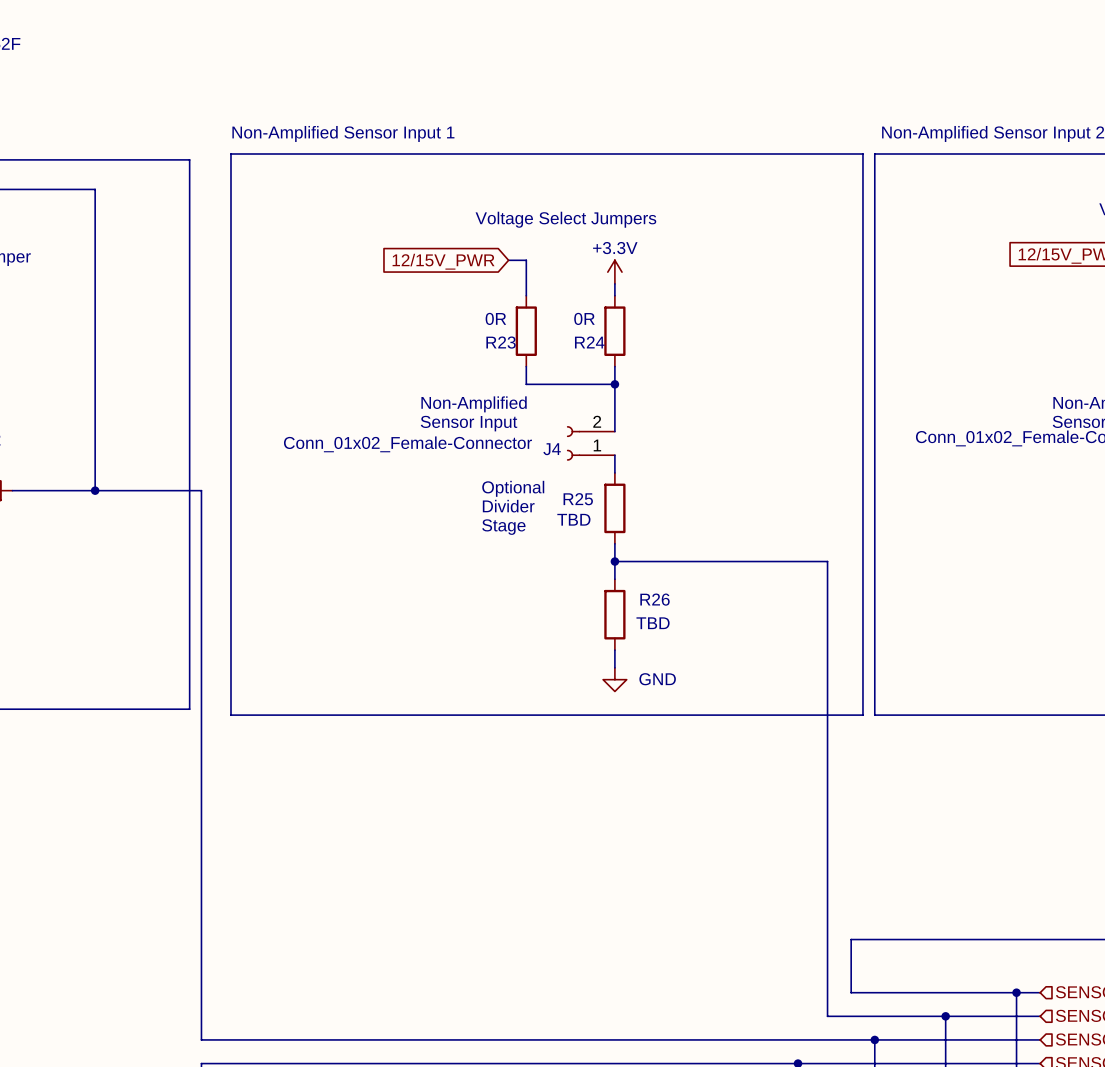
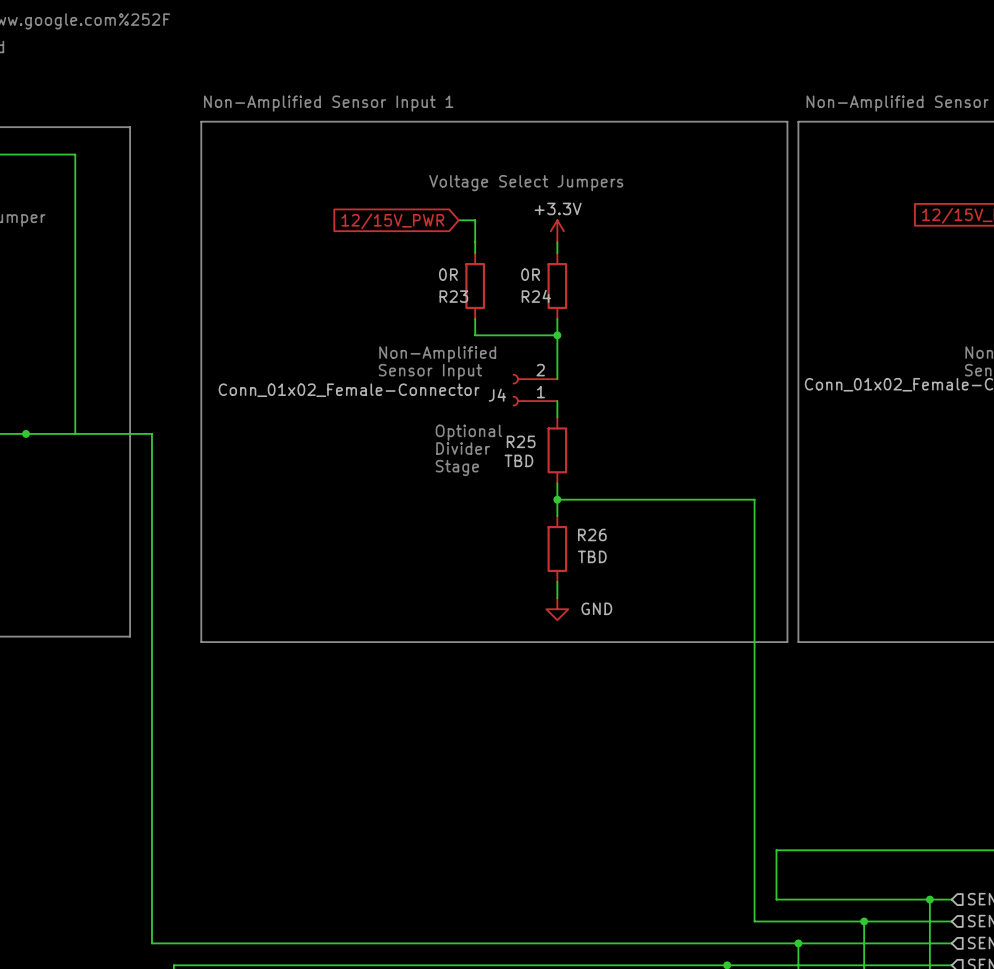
line: (154, 159) (189, 159) (189, 709) (154, 709) -> (130, 127) (130, 636)
junction position: (95, 490) -> (25, 433)
wire: (177, 490) (201, 490) (201, 1039) -> (151, 433) (151, 943) (173, 943)

